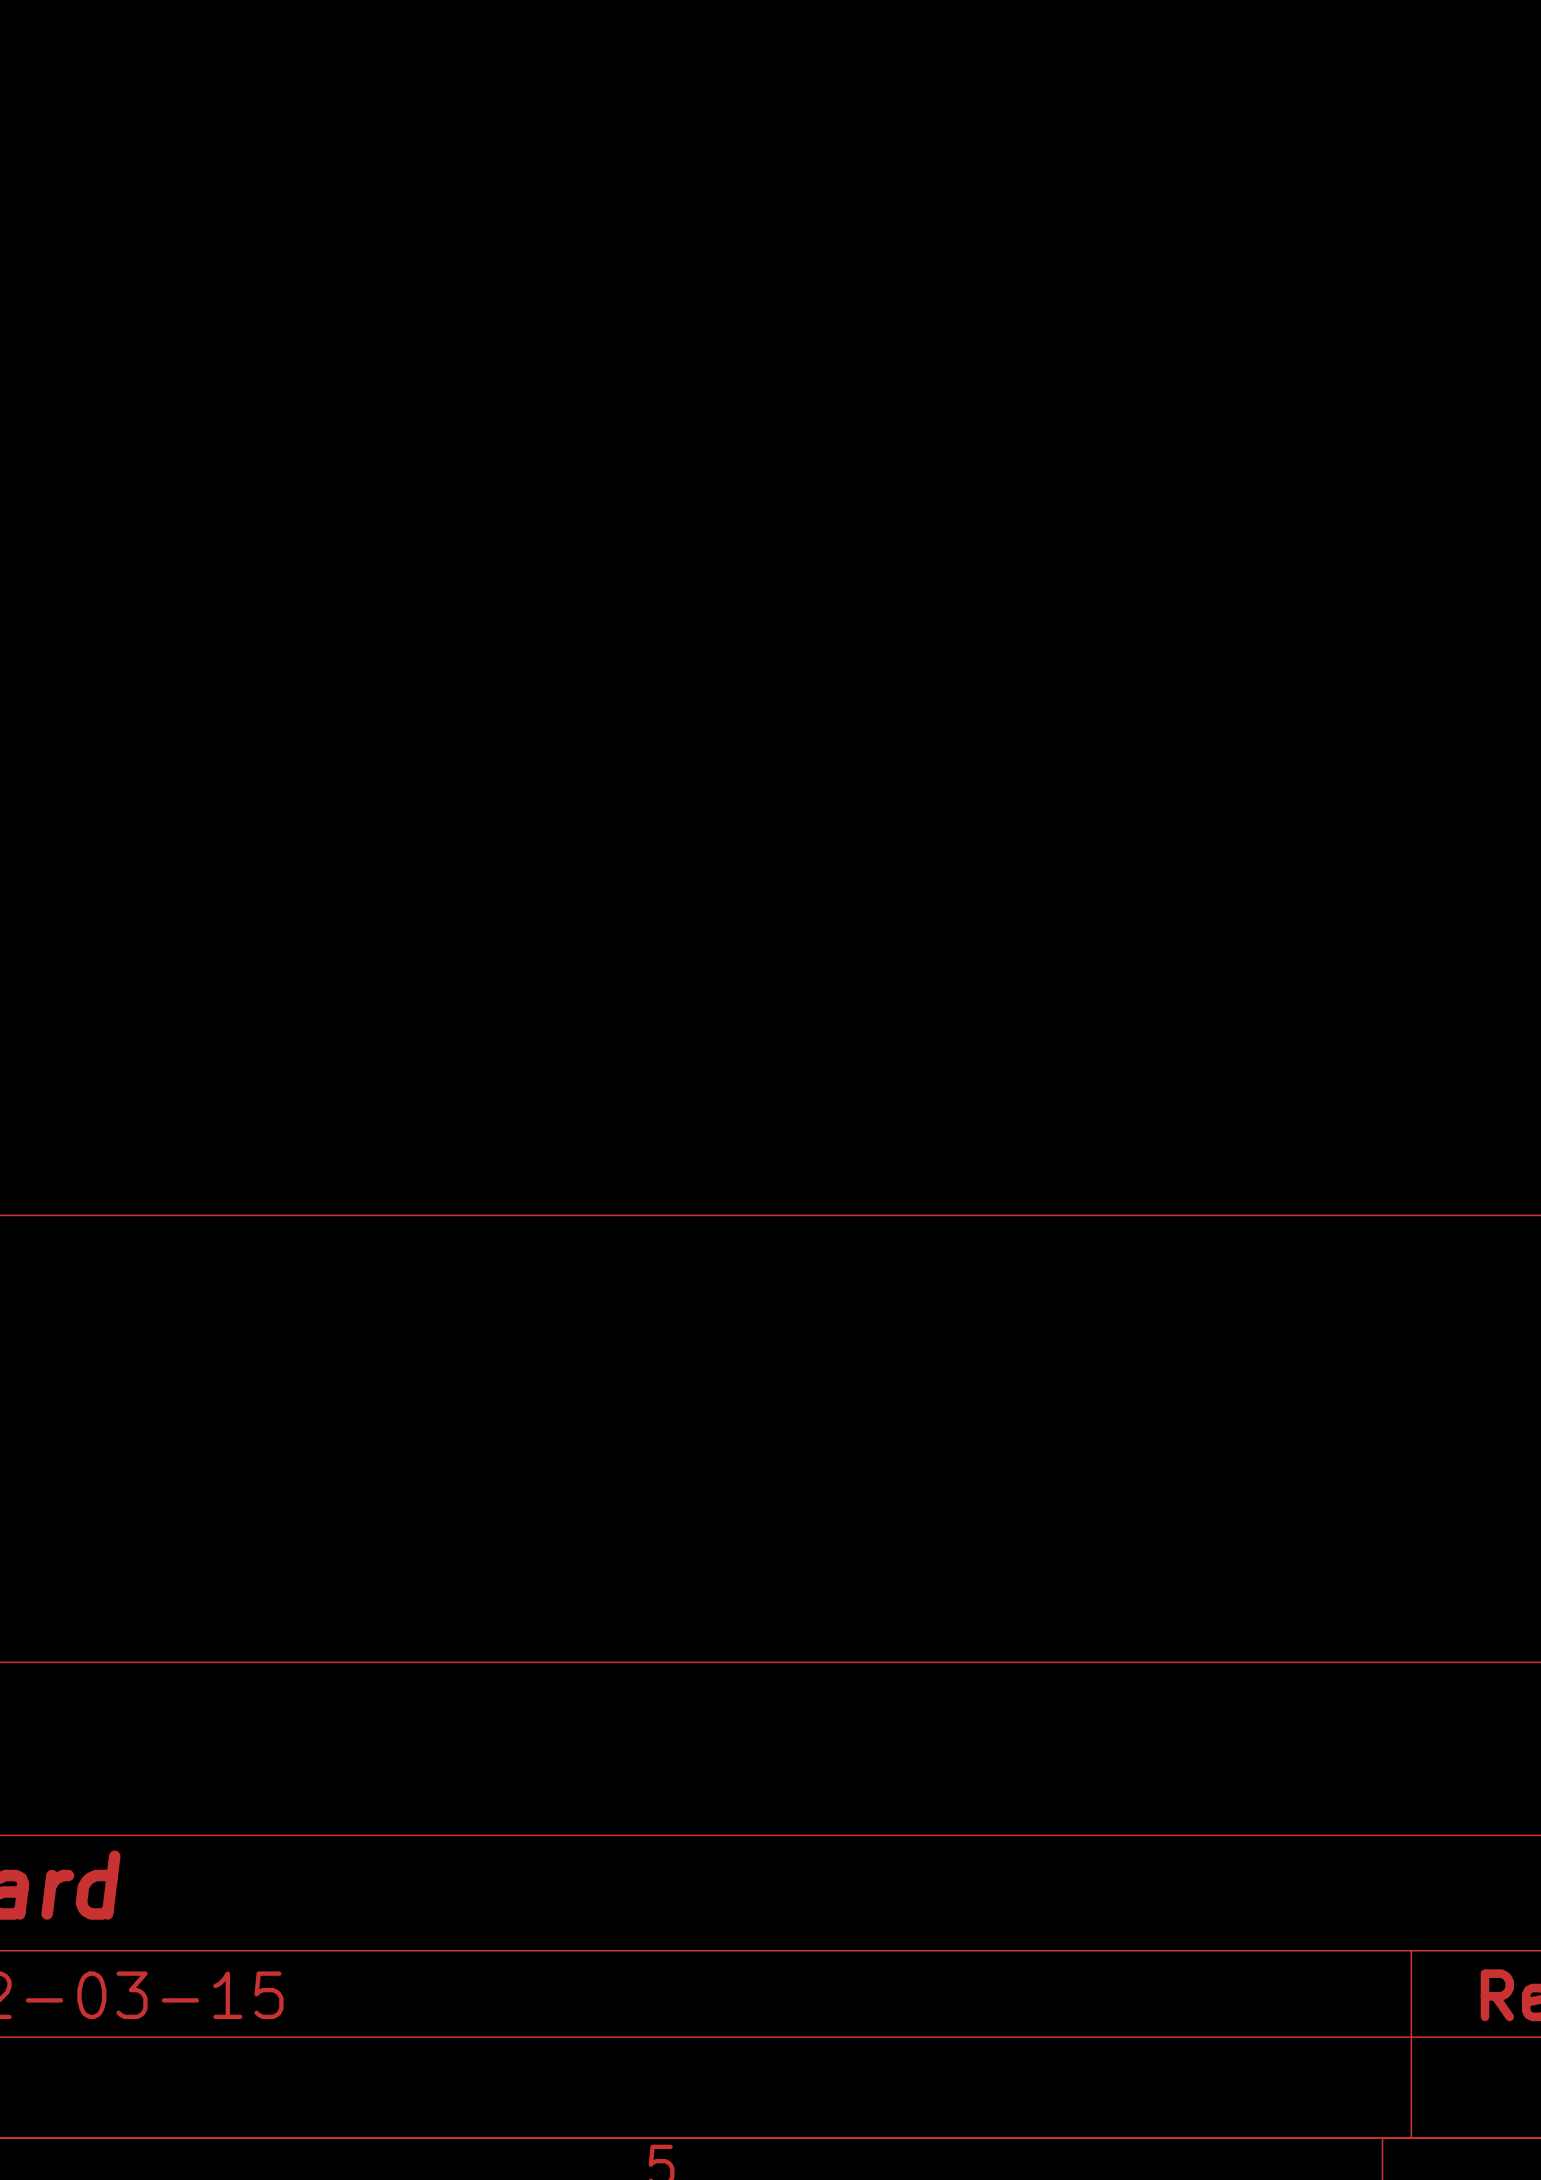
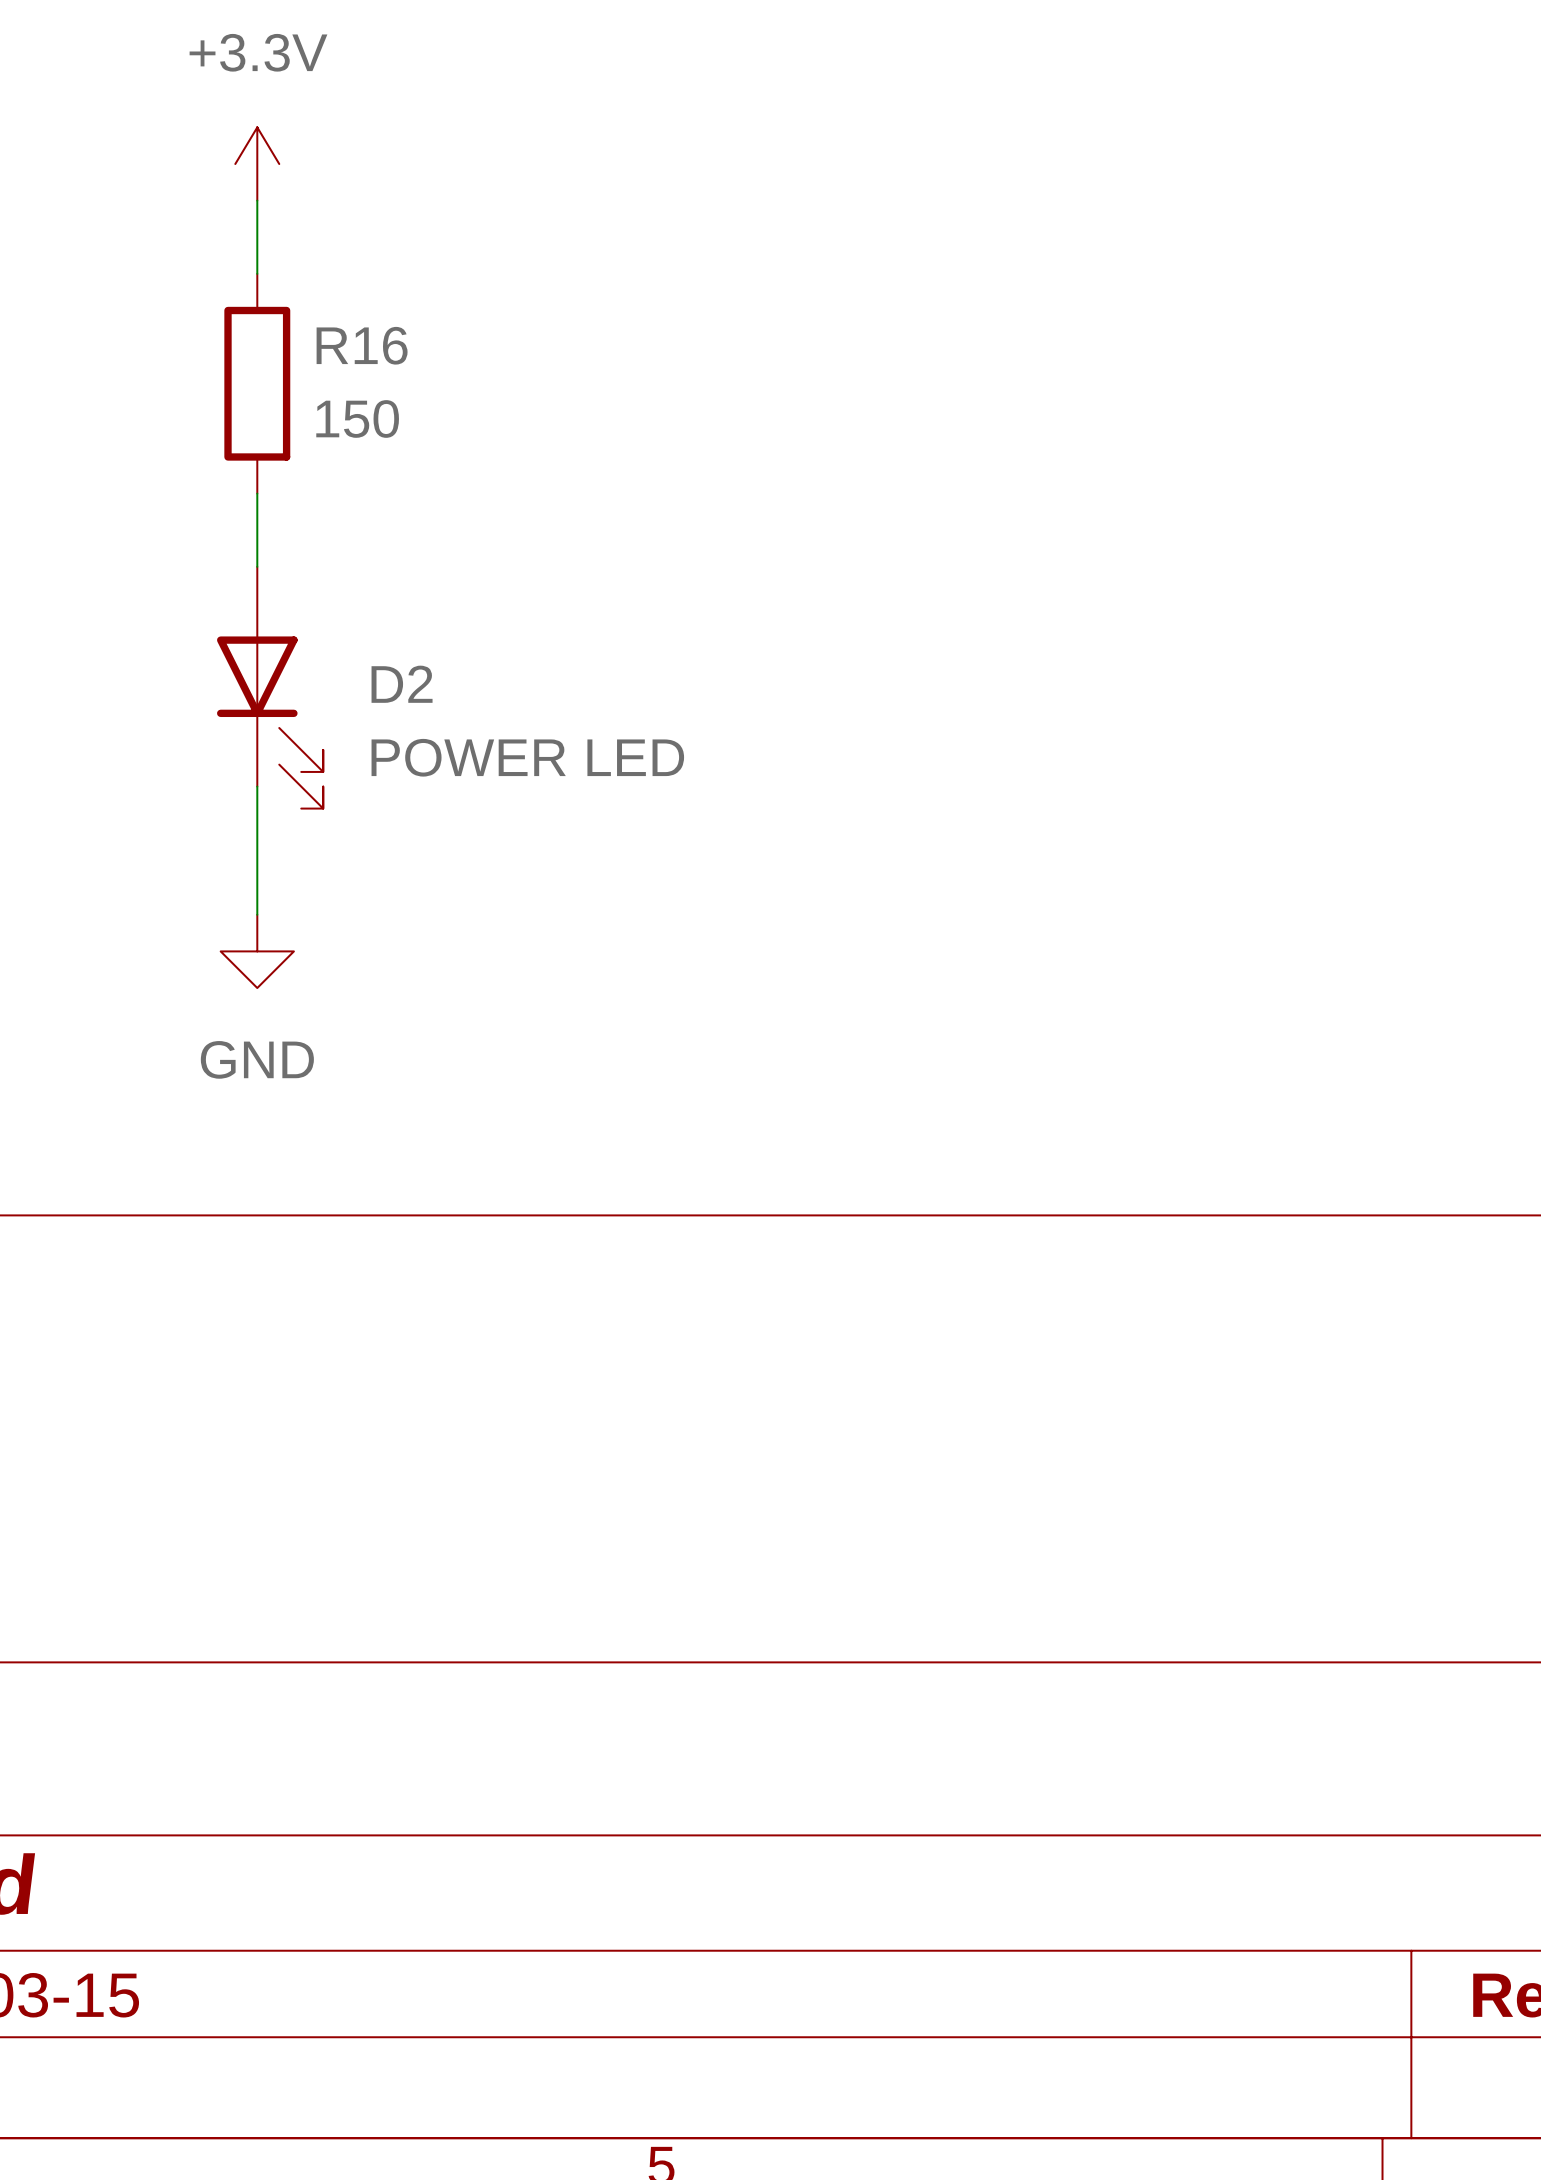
power symbol: none -> +3.3V (257, 164)
wire: none -> (257, 200) (257, 273)
R16: none -> 150 (257, 383)
wire: none -> (257, 493) (257, 566)
D2: none -> POWER LED (270, 687)
wire: none -> (257, 786) (257, 914)
power symbol: none -> GND (257, 951)

